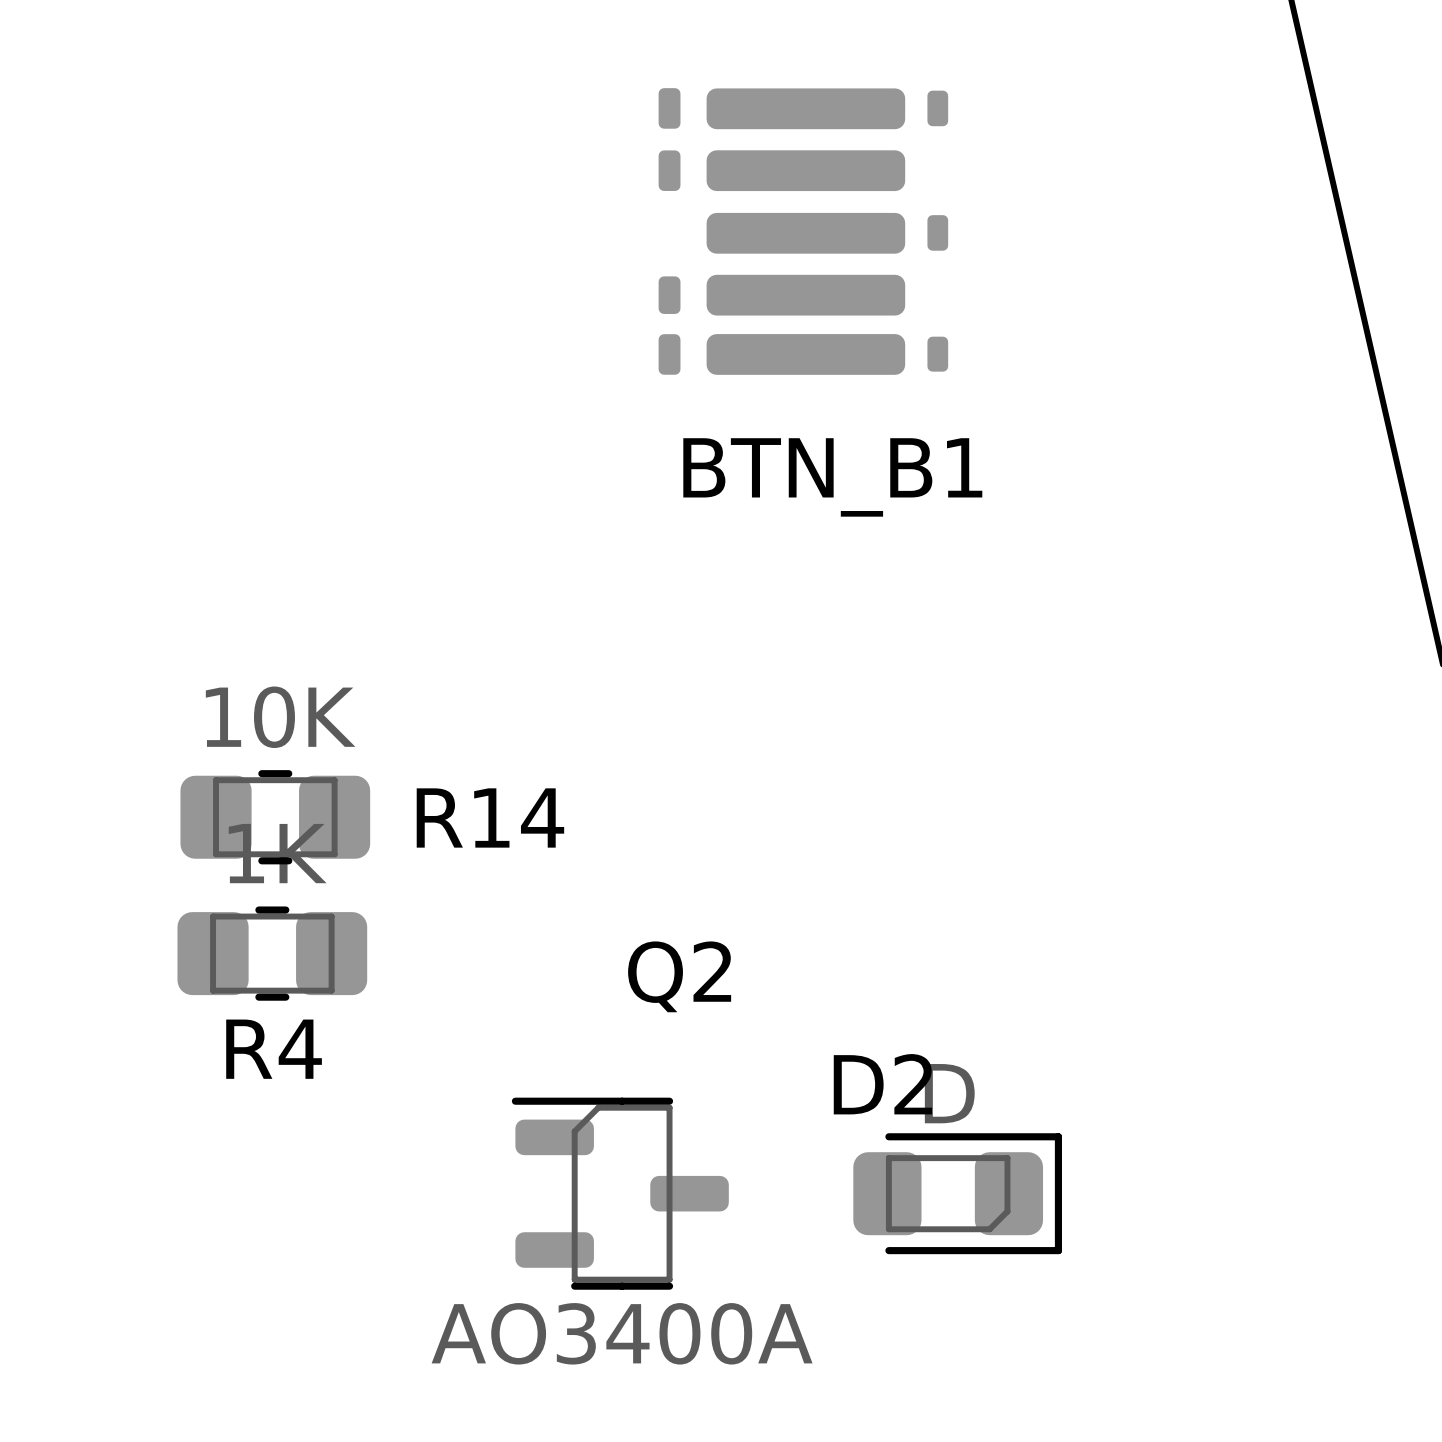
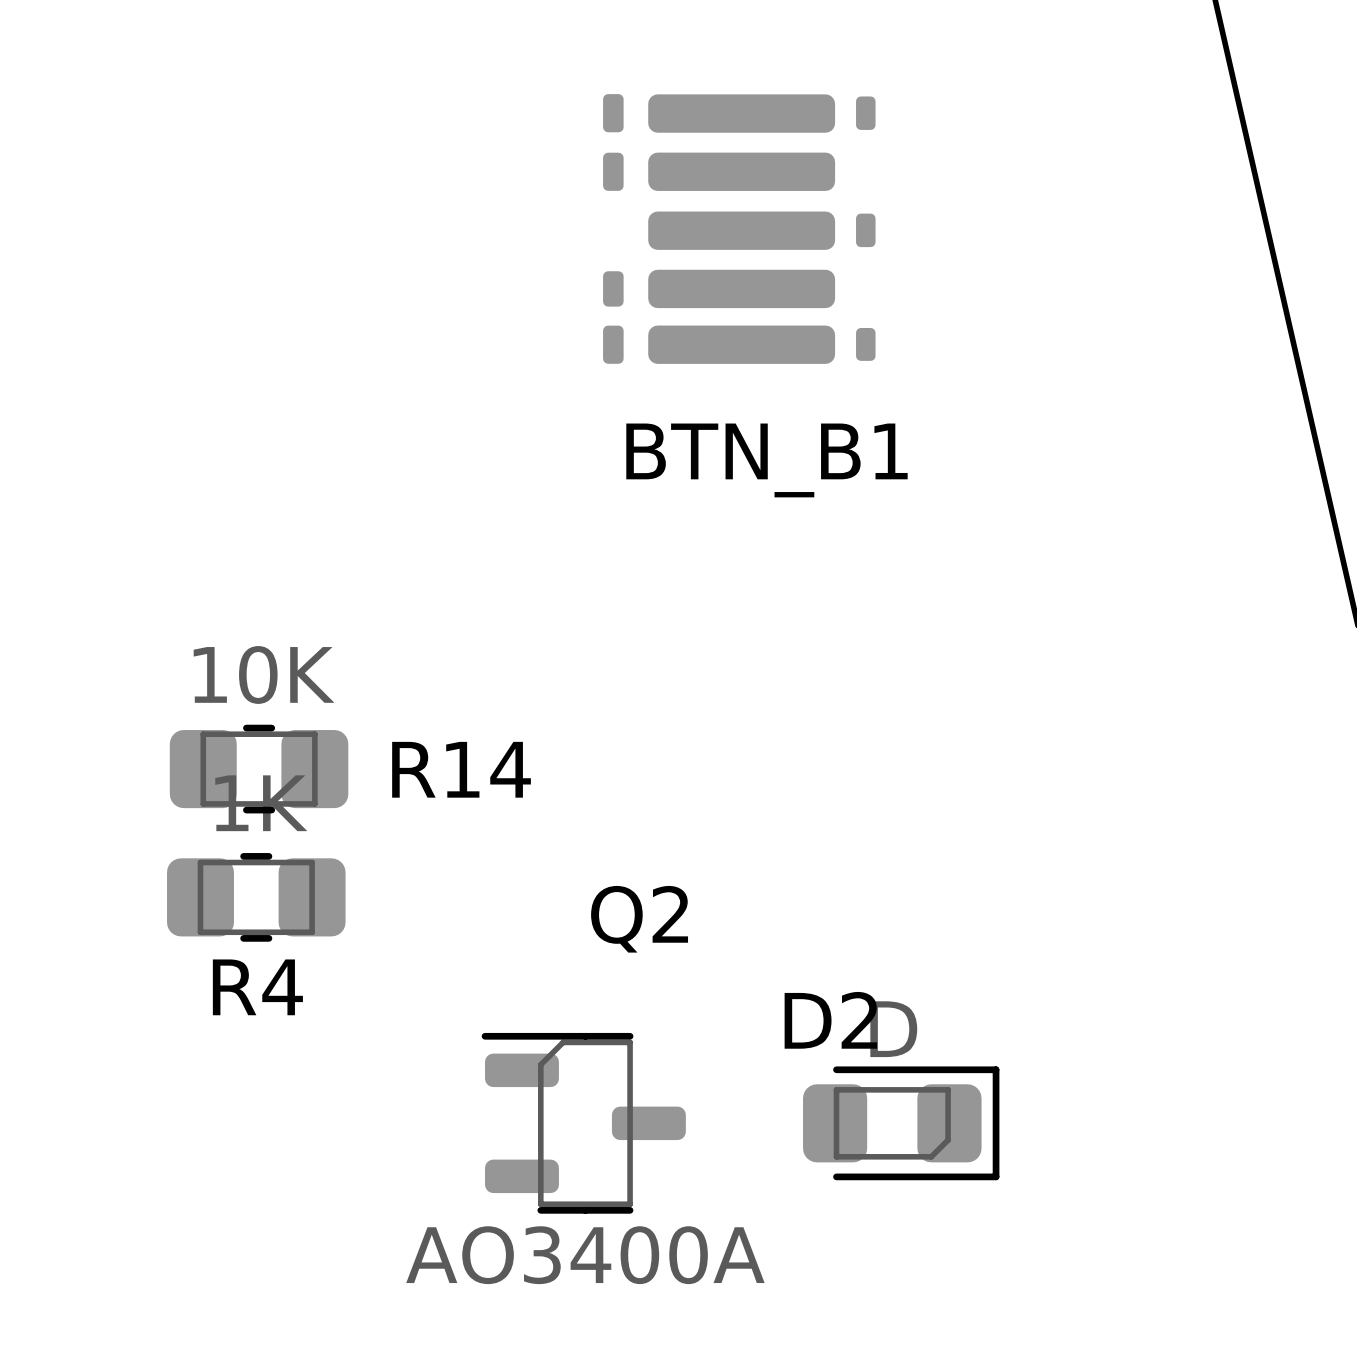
BTN_B1 position: (803, 231) -> (739, 229)

